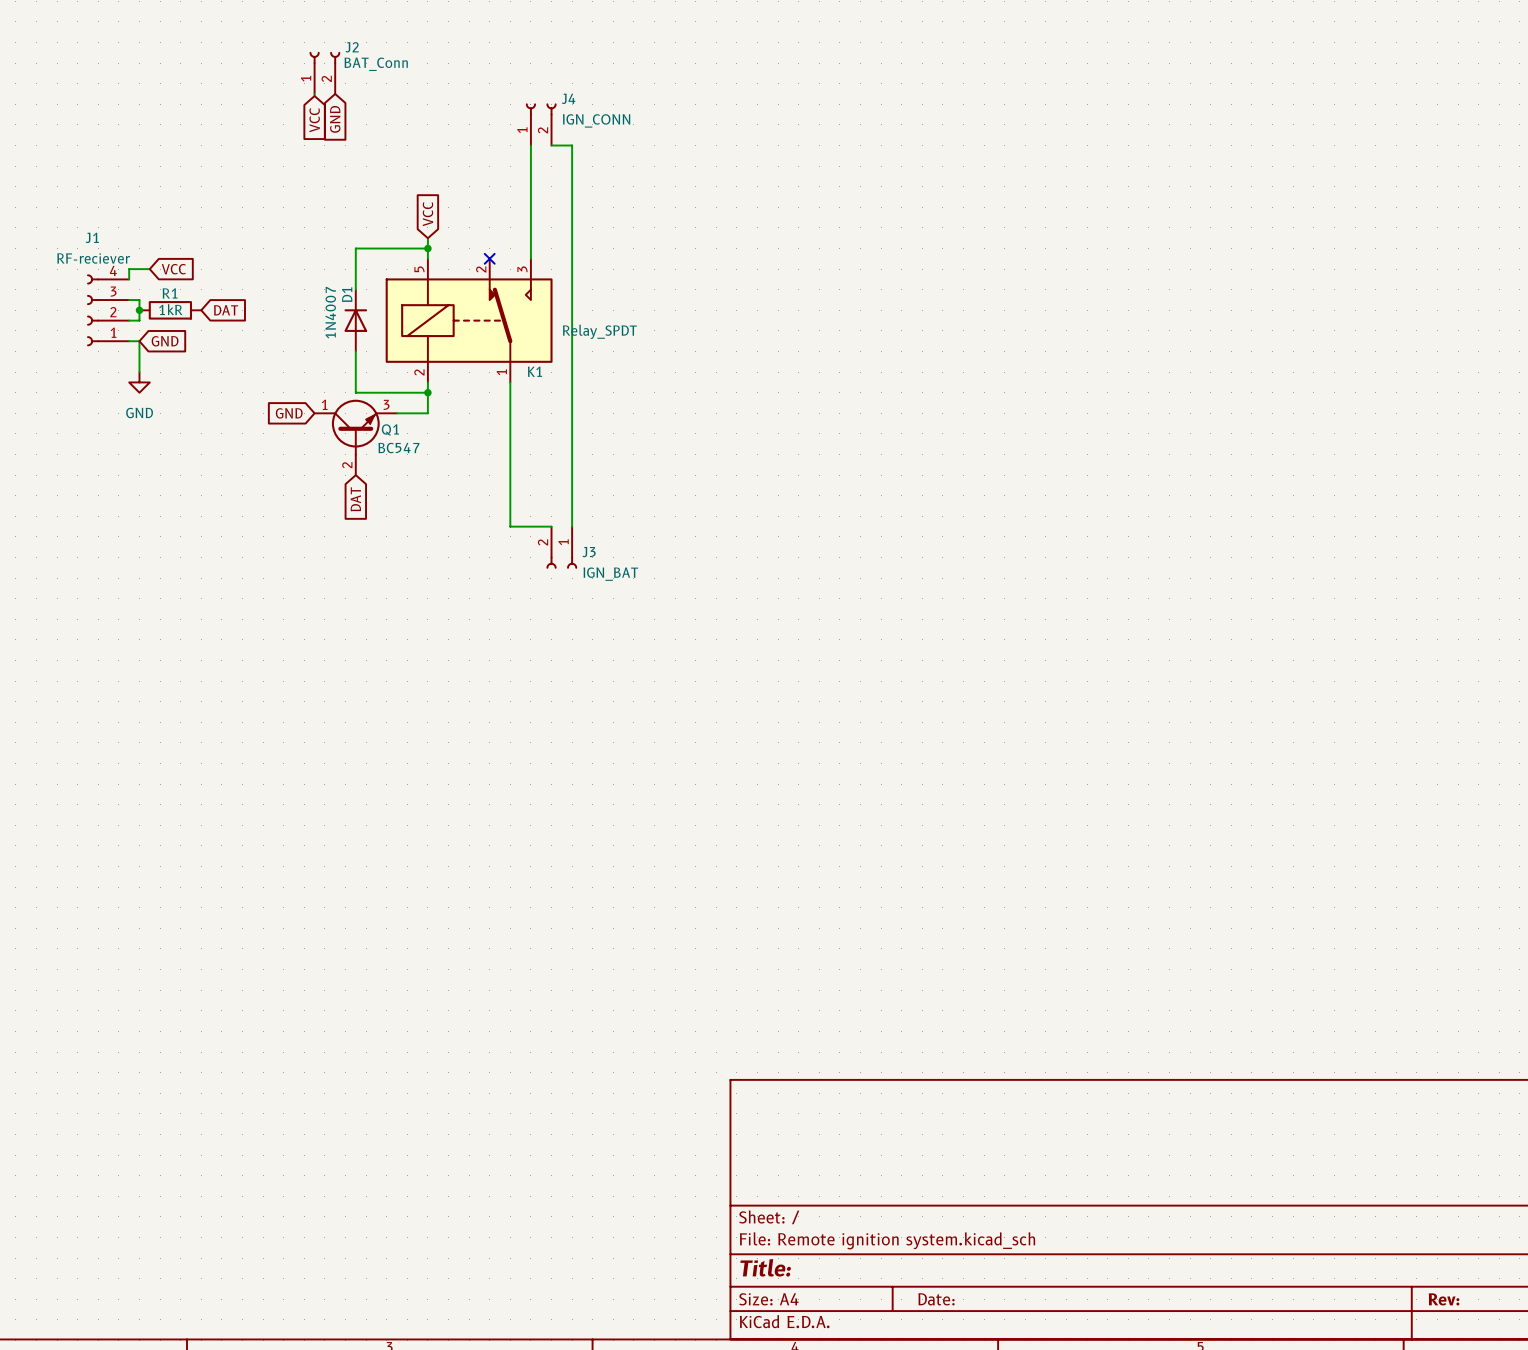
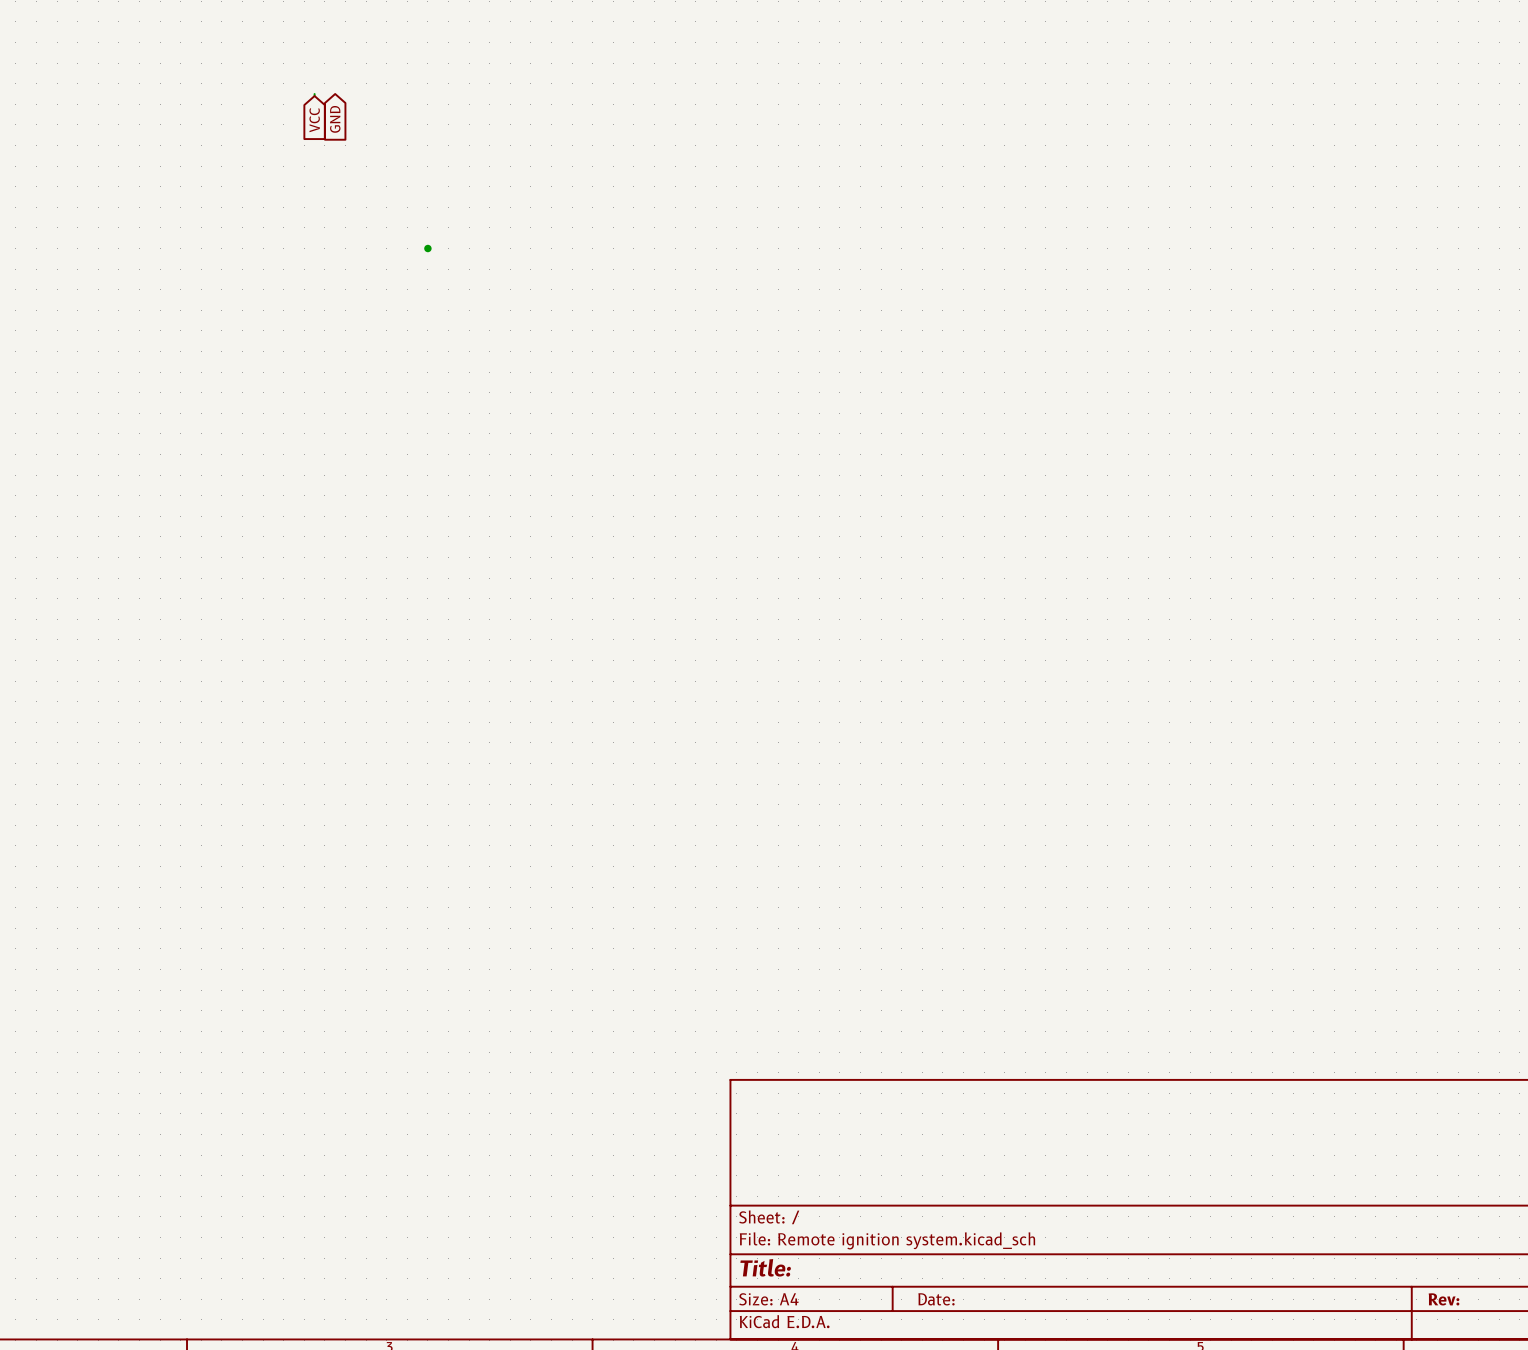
J2: BAT_Conn (324, 73) -> none
J4: IGN_CONN (541, 124) -> none
wire: (530, 145) (530, 258) -> none
wire: (551, 145) (572, 145) (572, 526) -> none
global label: VCC (427, 214) -> none
wire: (427, 238) (427, 258) -> none
wire: (427, 248) (355, 248) (355, 289) -> none
no-connect mark: (489, 258) -> none
wire: (149, 269) (129, 269) (129, 279) -> none
global label: VCC (173, 269) -> none
wire: (129, 300) (139, 300) (139, 320) (129, 320) -> none
J1: RF-reciever (108, 310) -> none
junction: (139, 310) -> none
R1: 1kR (170, 310) -> none
global label: DAT (226, 310) -> none
D1: 1N4007 (355, 320) -> none
K1: Relay_SPDT (469, 320) -> none
wire: (129, 341) (139, 341) (139, 372) -> none
global label: GND (165, 341) -> none
wire: (355, 351) (355, 392) (427, 392) -> none
power symbol: GND (139, 382) -> none
wire: (427, 382) (427, 413) (397, 413) -> none
wire: (510, 382) (510, 526) (551, 526) -> none
junction: (427, 392) -> none
global label: GND (289, 413) -> none
Q1: BC547 (355, 437) -> none
global label: DAT (355, 499) -> none
J3: IGN_BAT (561, 547) -> none

